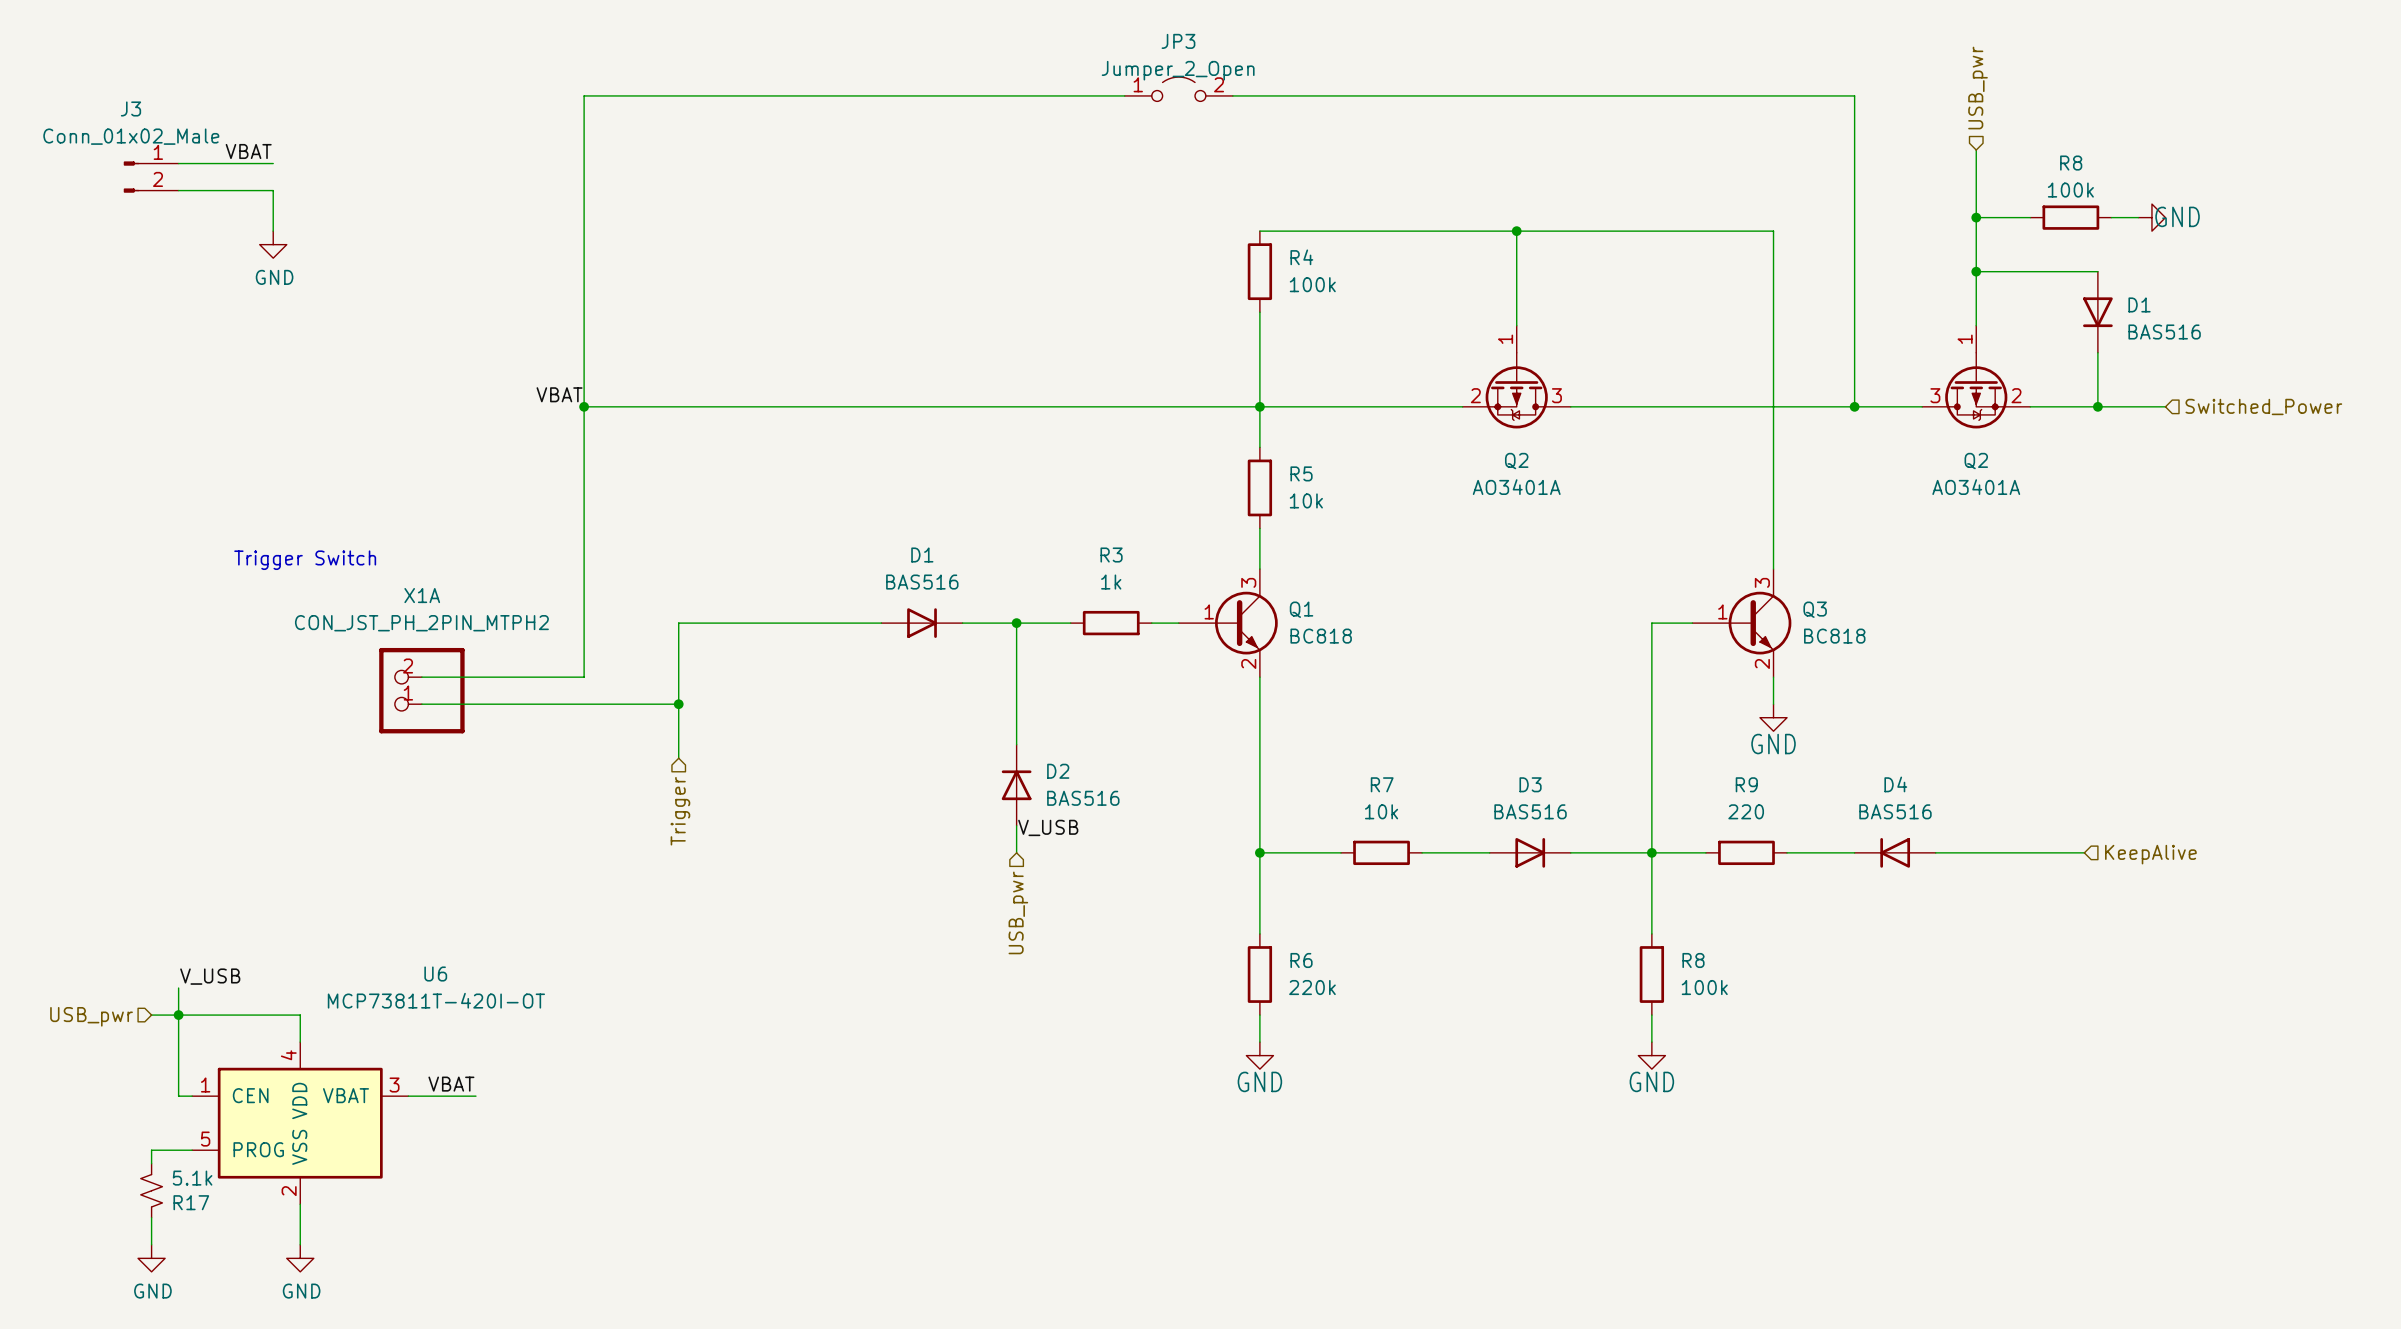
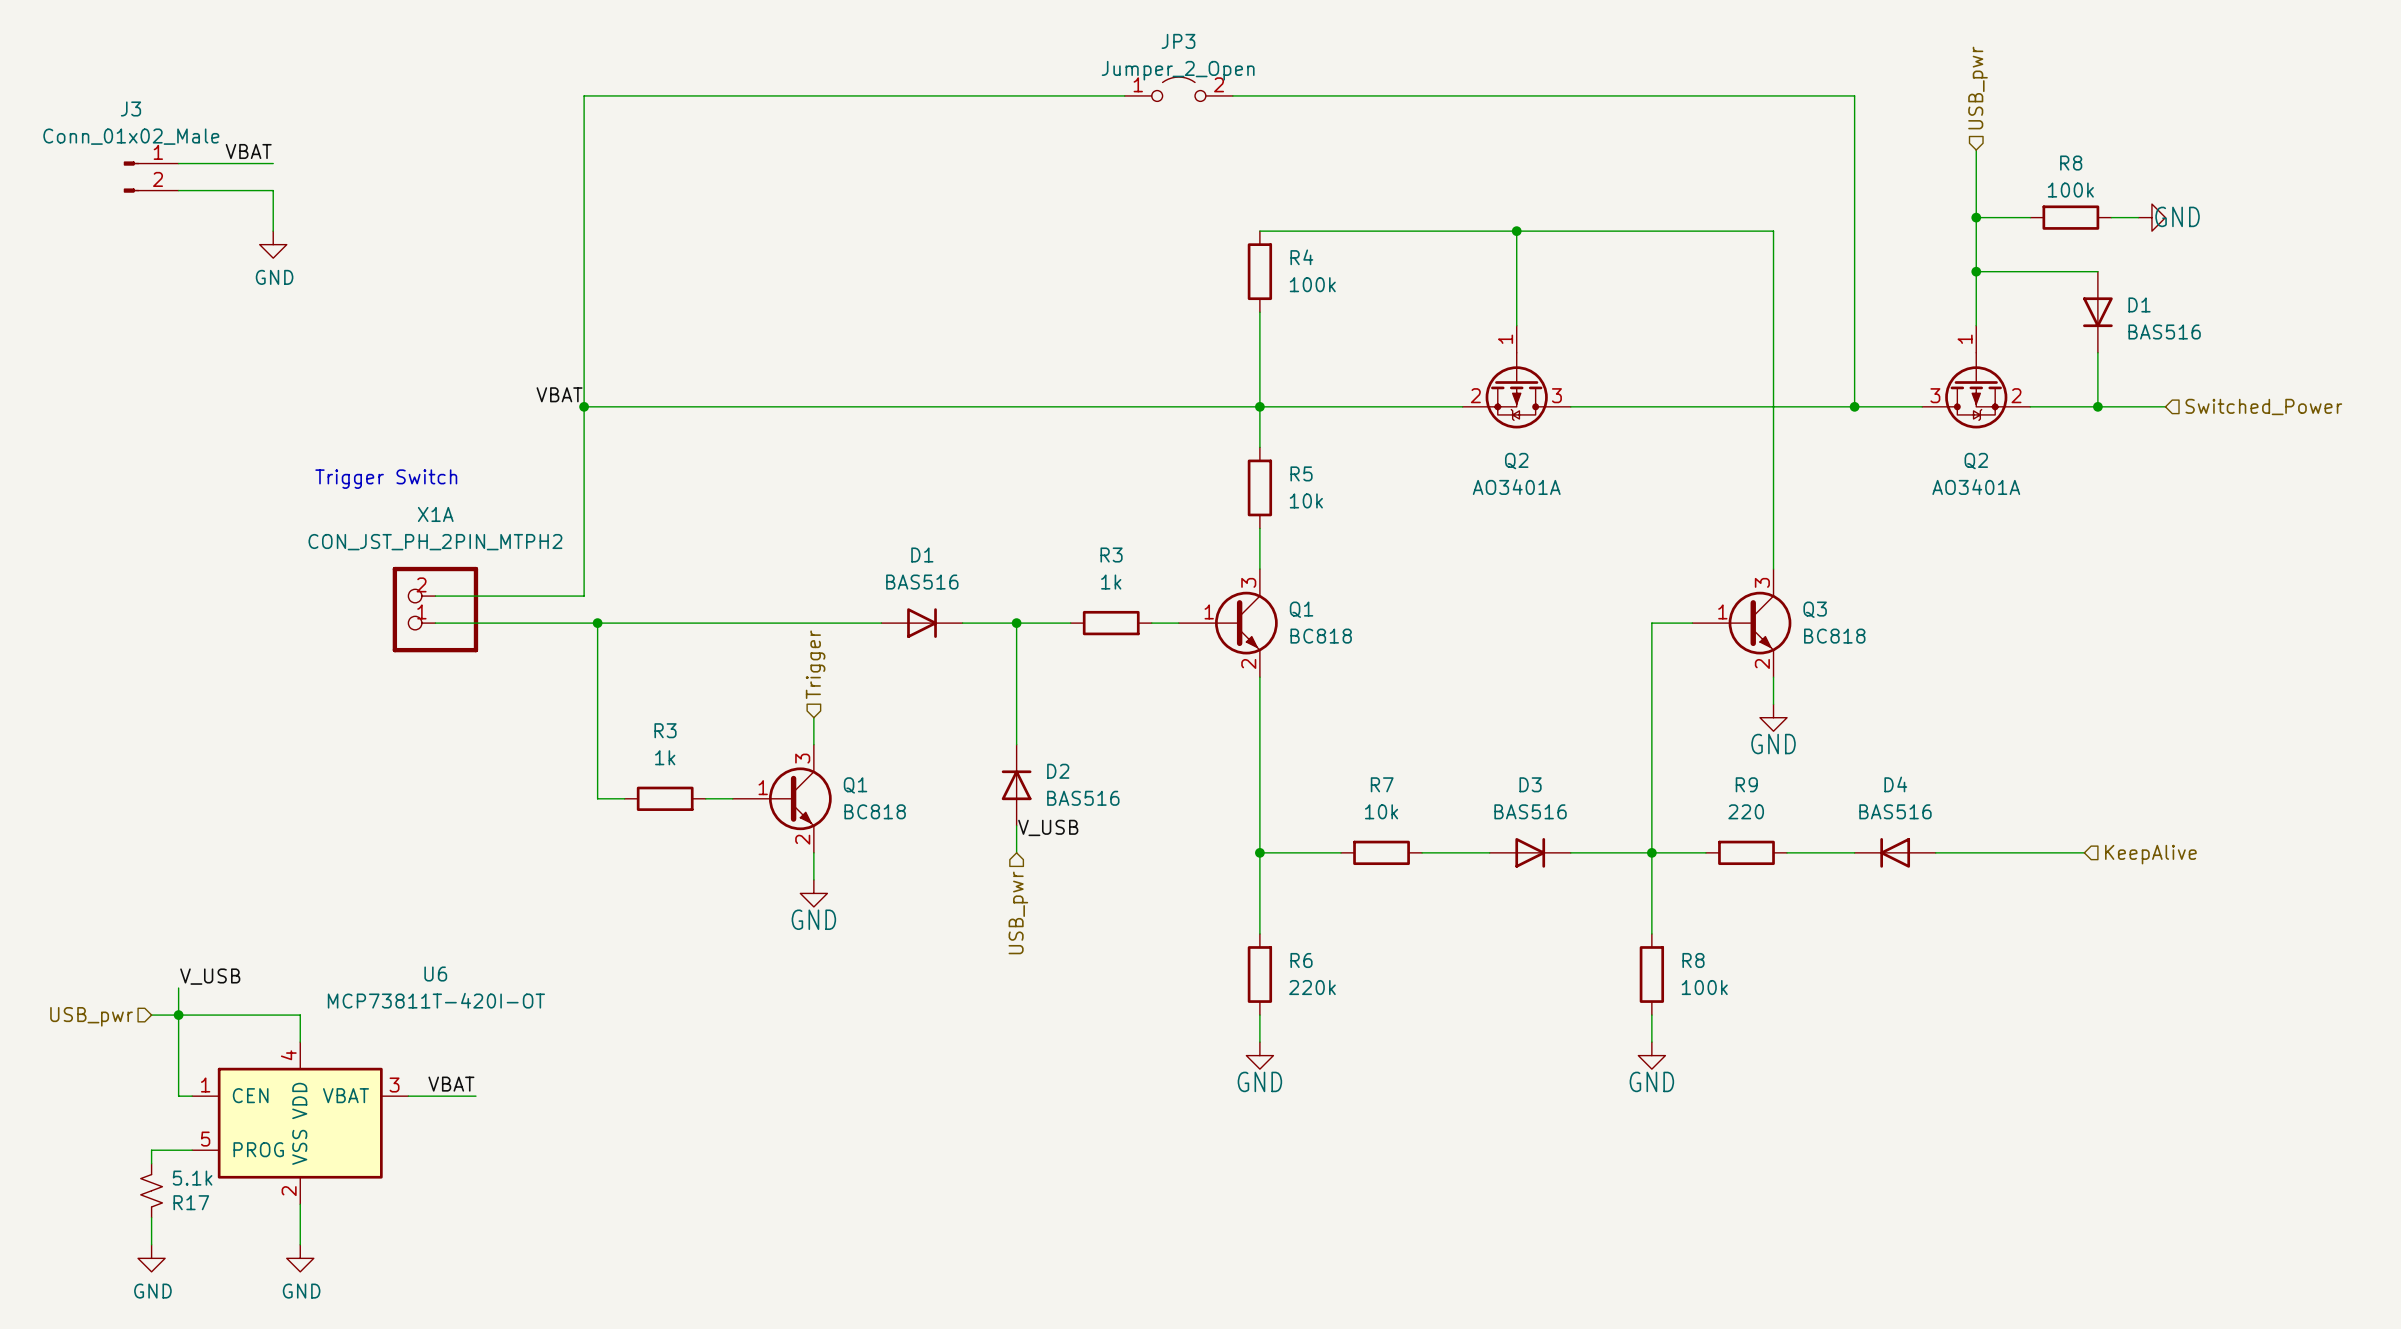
text position: Trigger Switch (305, 560) -> Trigger Switch (386, 479)
wire: (584, 596) (584, 677) (421, 677) -> (584, 596) (435, 596)
wire: none -> (597, 623) (597, 798) (624, 798)
junction: none -> (597, 623)
wire: (678, 623) (678, 758) -> (678, 623) (435, 623)
X1A position: (421, 690) -> (435, 609)
wire: (421, 704) (678, 704) -> none
junction: (678, 704) -> none
wire: none -> (813, 717) (813, 744)
R3: none -> 1k (665, 798)
wire: none -> (705, 798) (732, 798)
Q1: none -> BC818 (782, 798)
hierarchical label rotation: 0° (680, 811) -> 180° (815, 664)
hierarchical label position: Trigger (680, 811) -> Trigger (815, 664)
wire: none -> (813, 852) (813, 879)
power symbol: none -> GND (813, 893)

